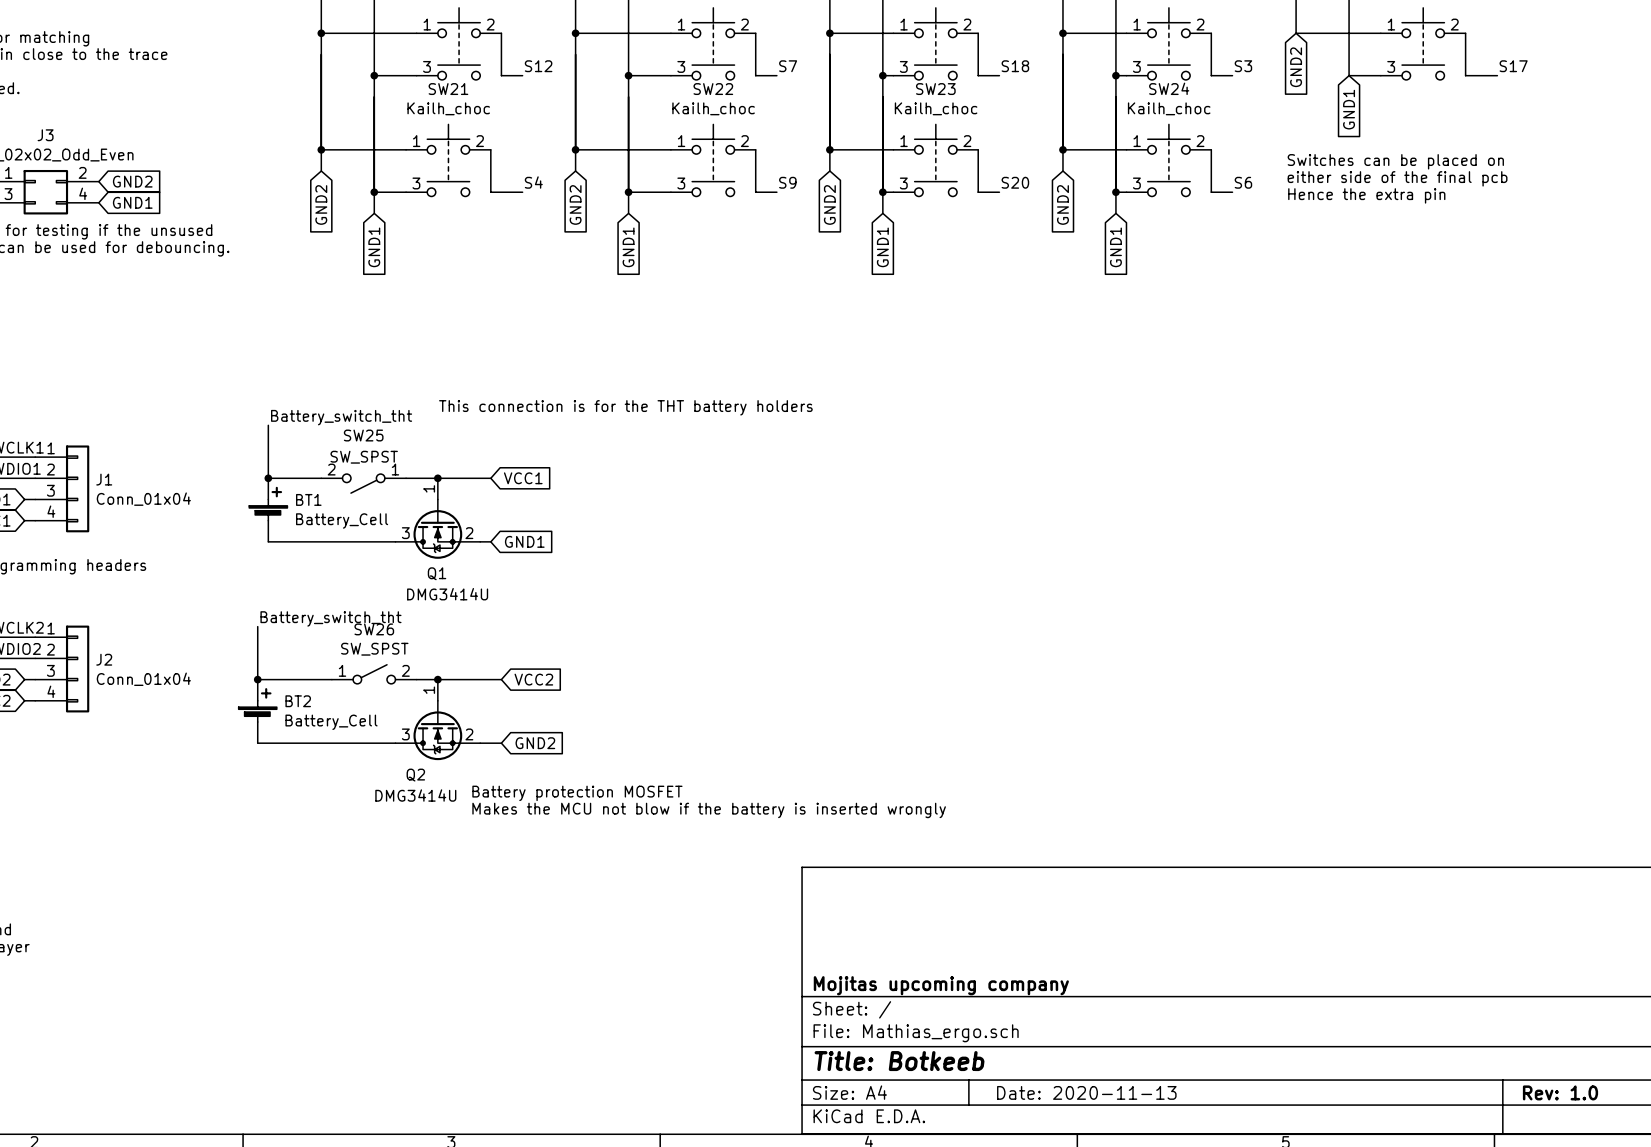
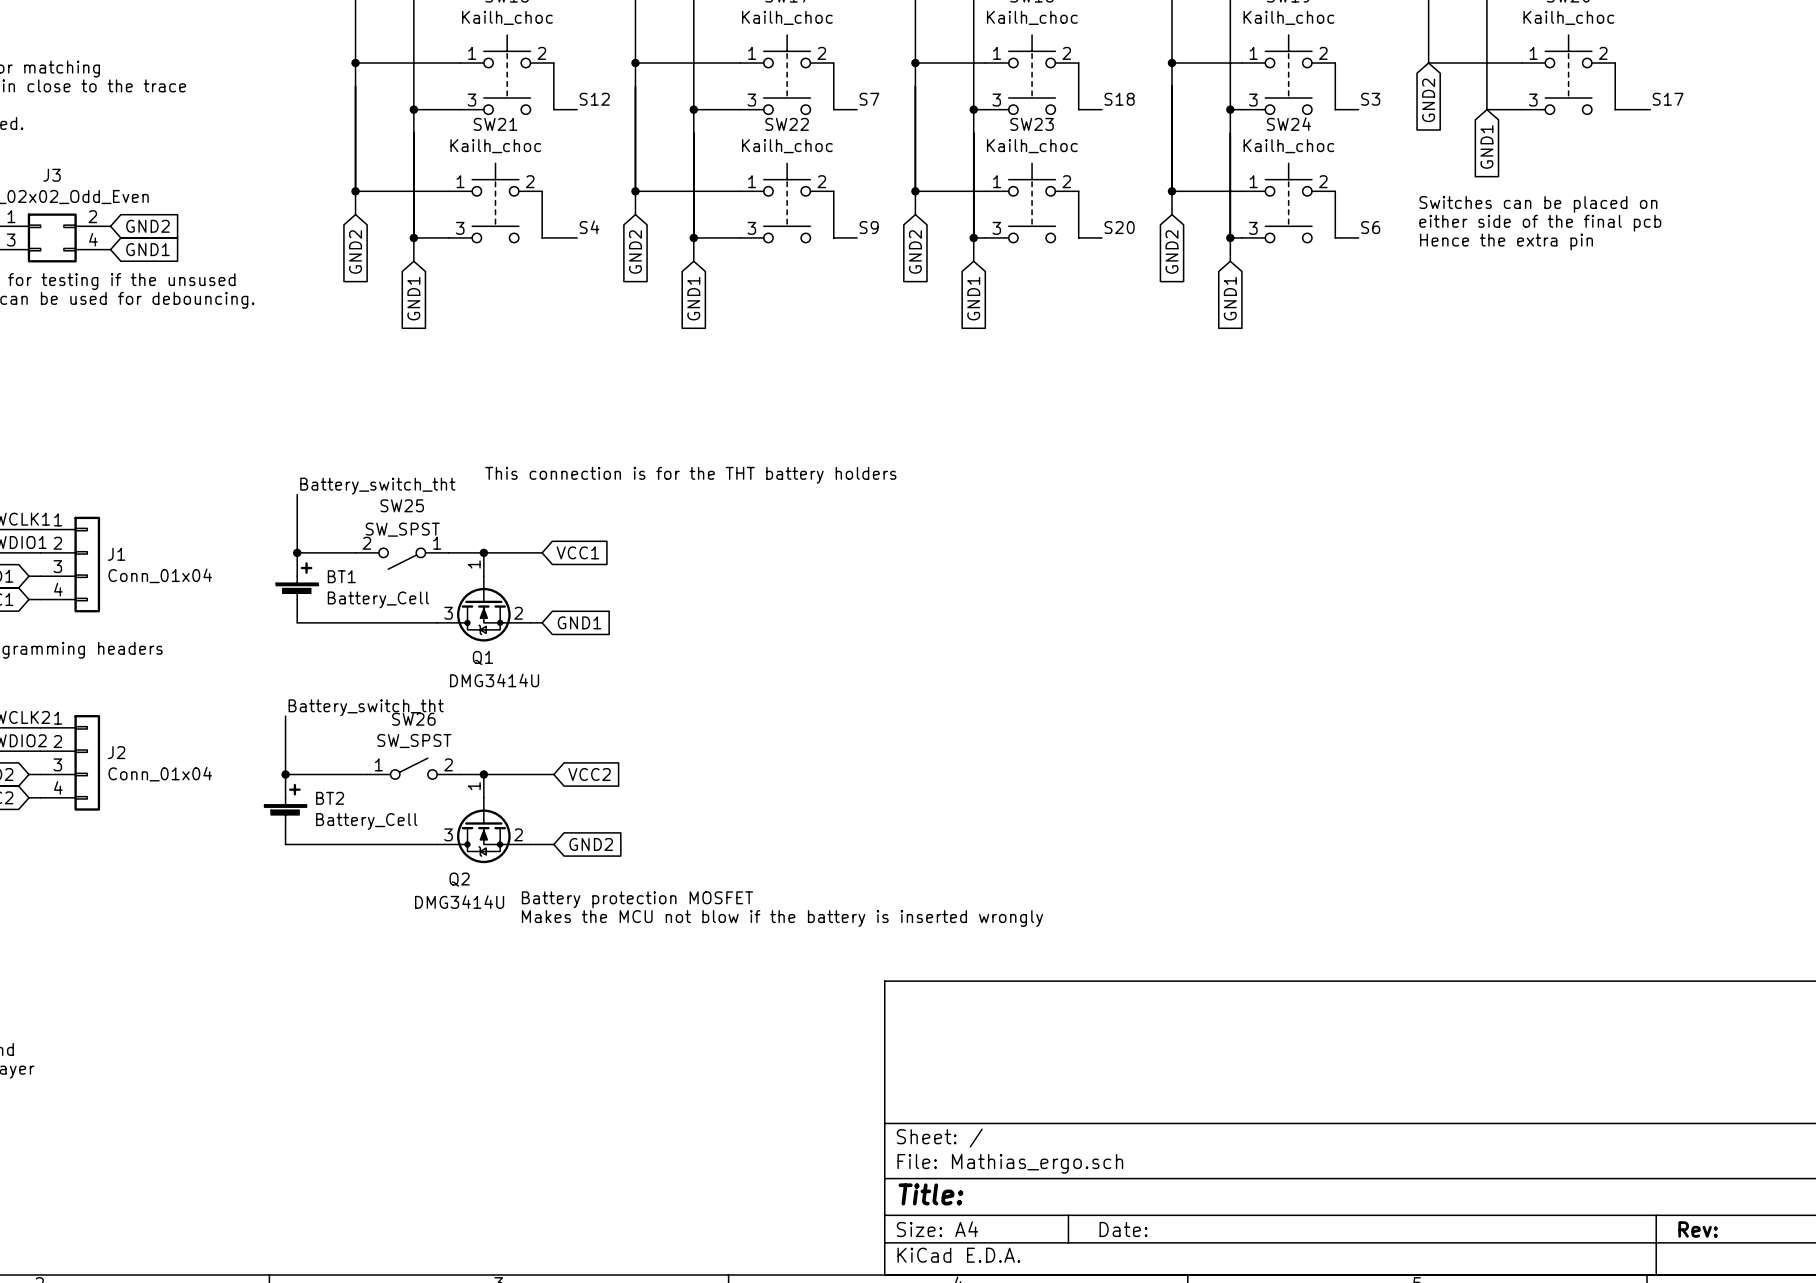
title block: Mojitas upcoming company (941, 985) -> none
title block: Title: Botkeeb (899, 1061) -> Title: (930, 1194)
title block: Date: 2020-11-13 (1086, 1092) -> Date: (1123, 1229)
title block: Rev: 1.0 (1560, 1092) -> Rev: (1698, 1229)

